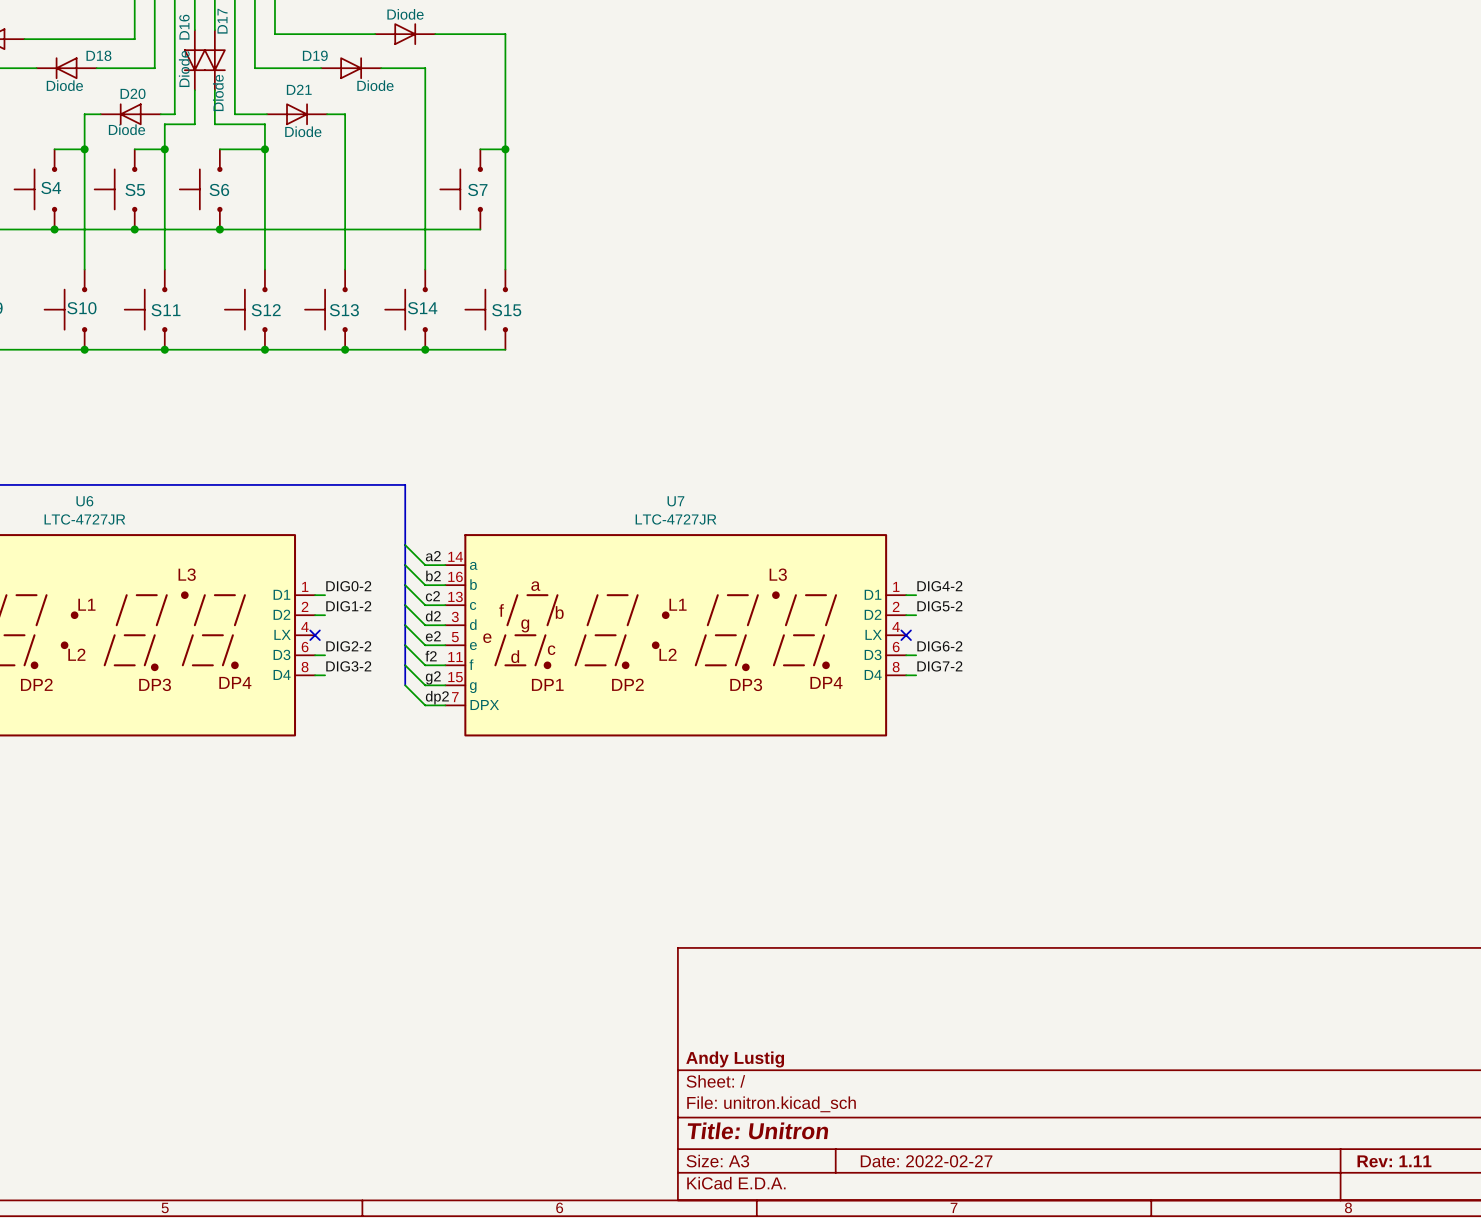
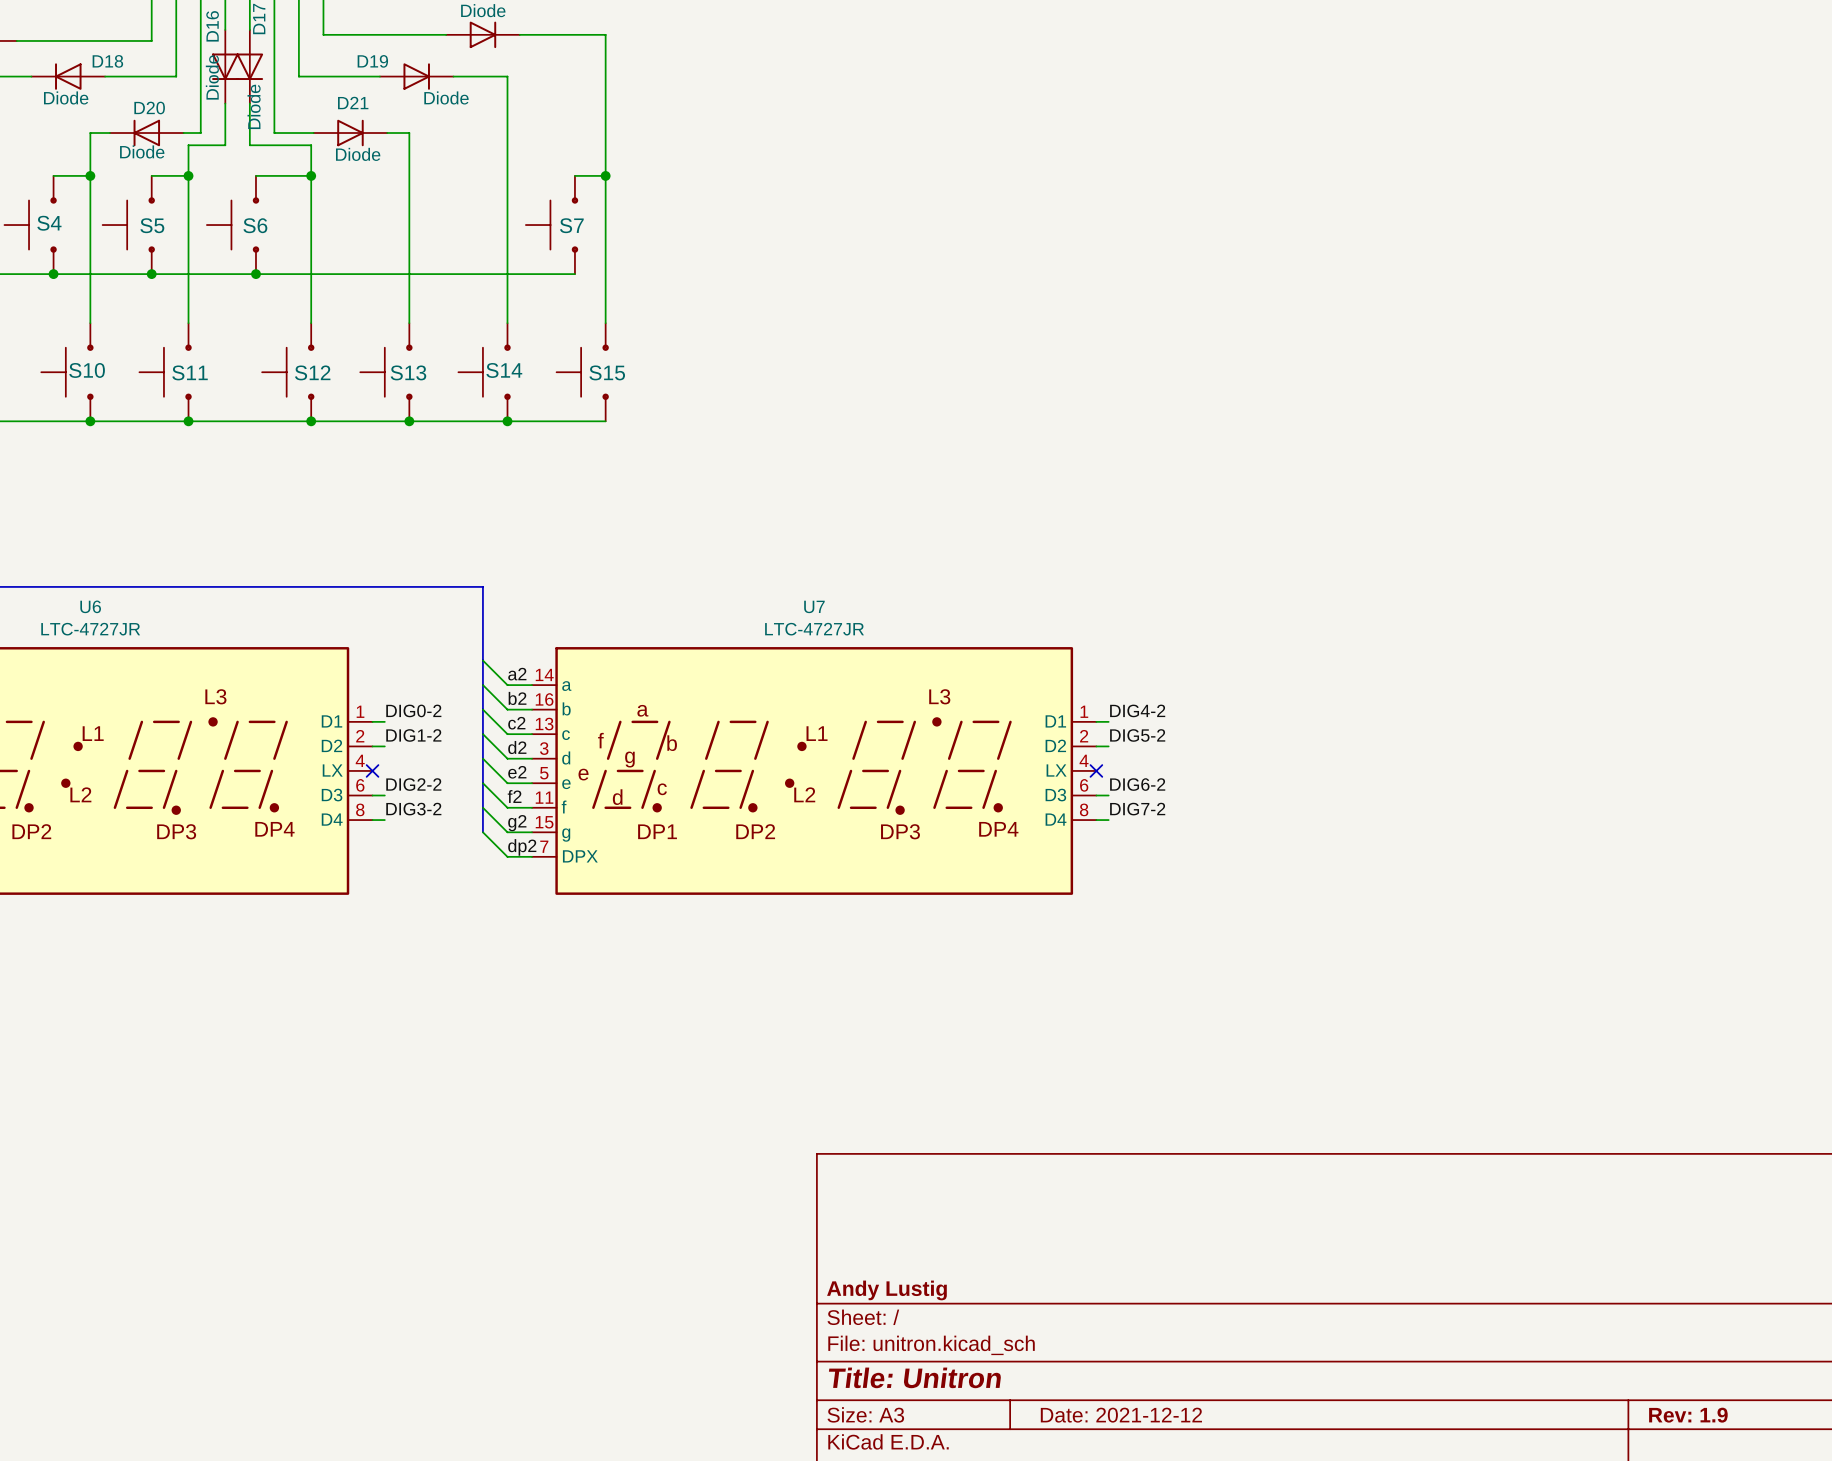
title block: Date: 2022-02-27 (926, 1161) -> Date: 2021-12-12 (1121, 1415)
title block: Rev: 1.11 (1394, 1161) -> Rev: 1.9 (1688, 1415)

